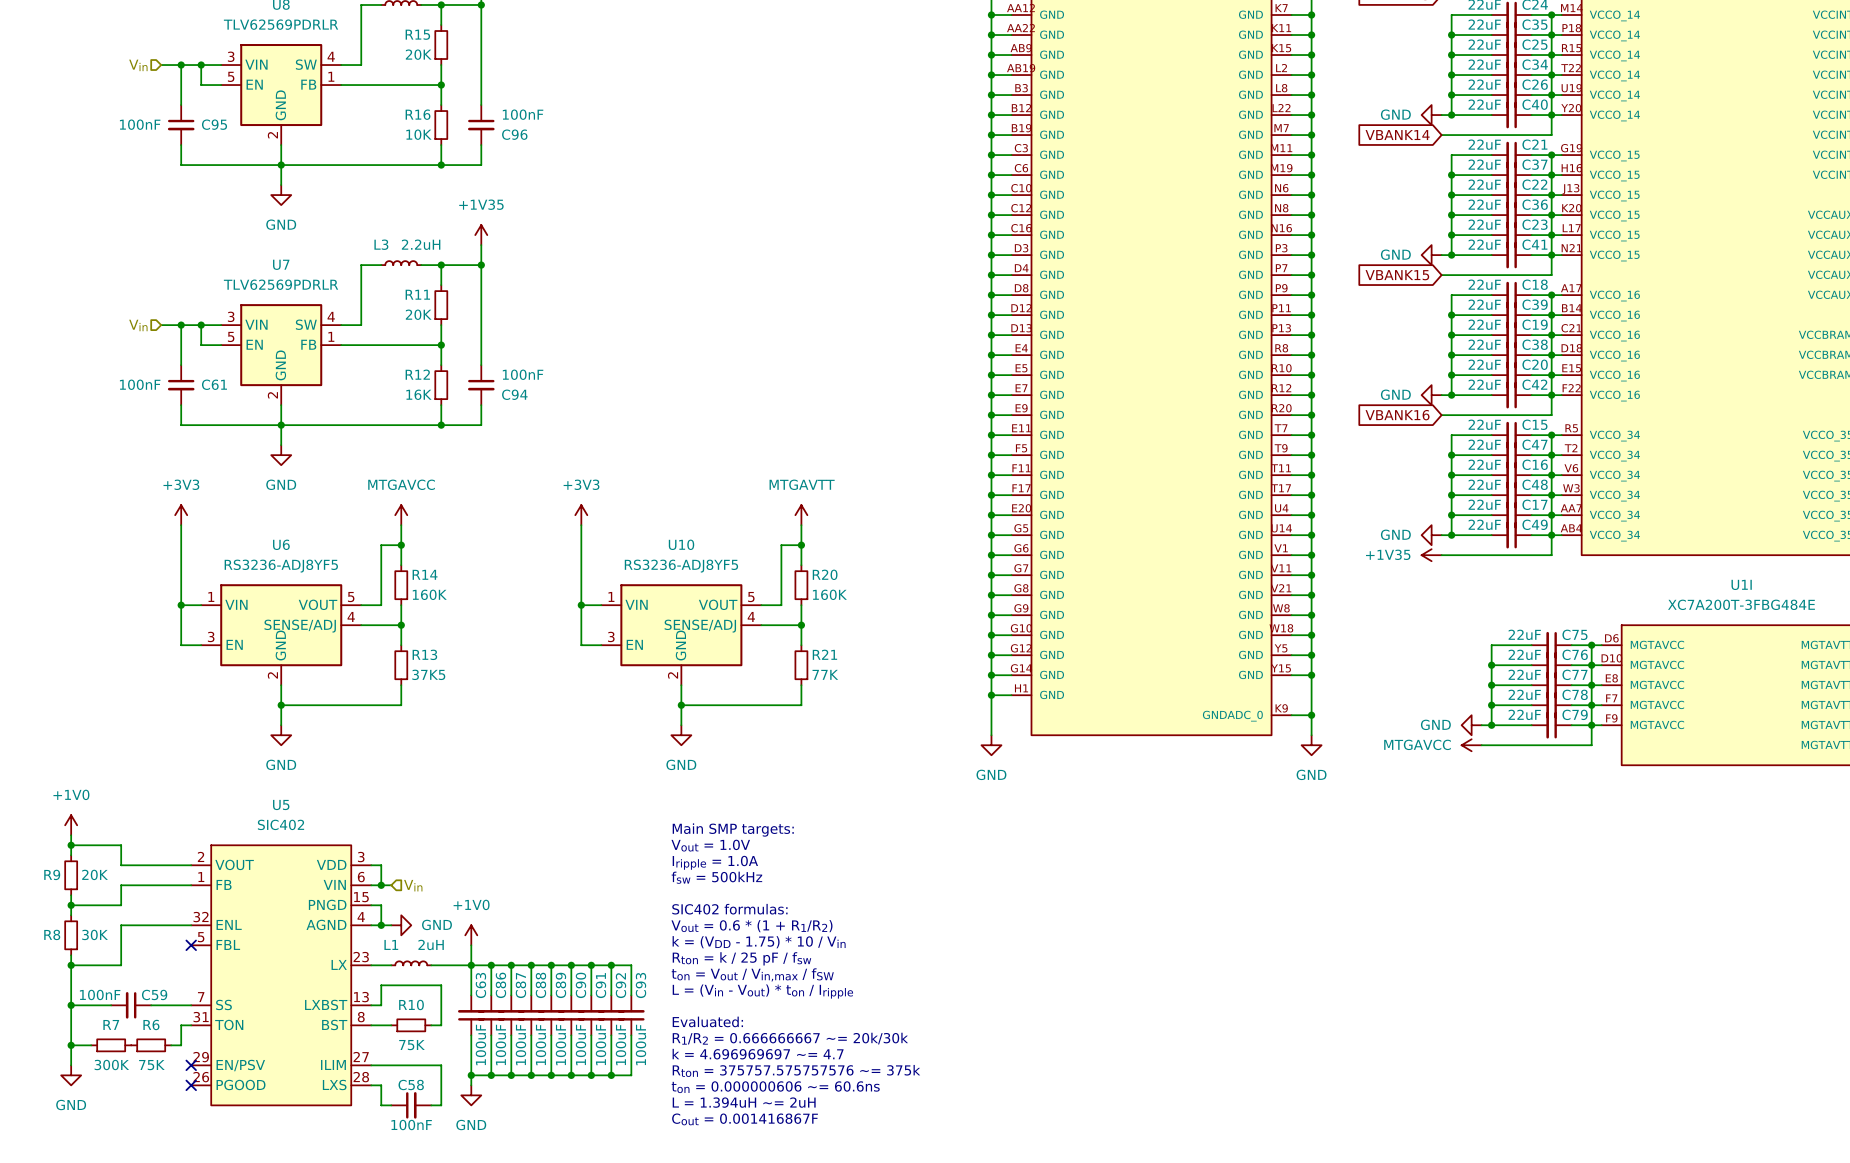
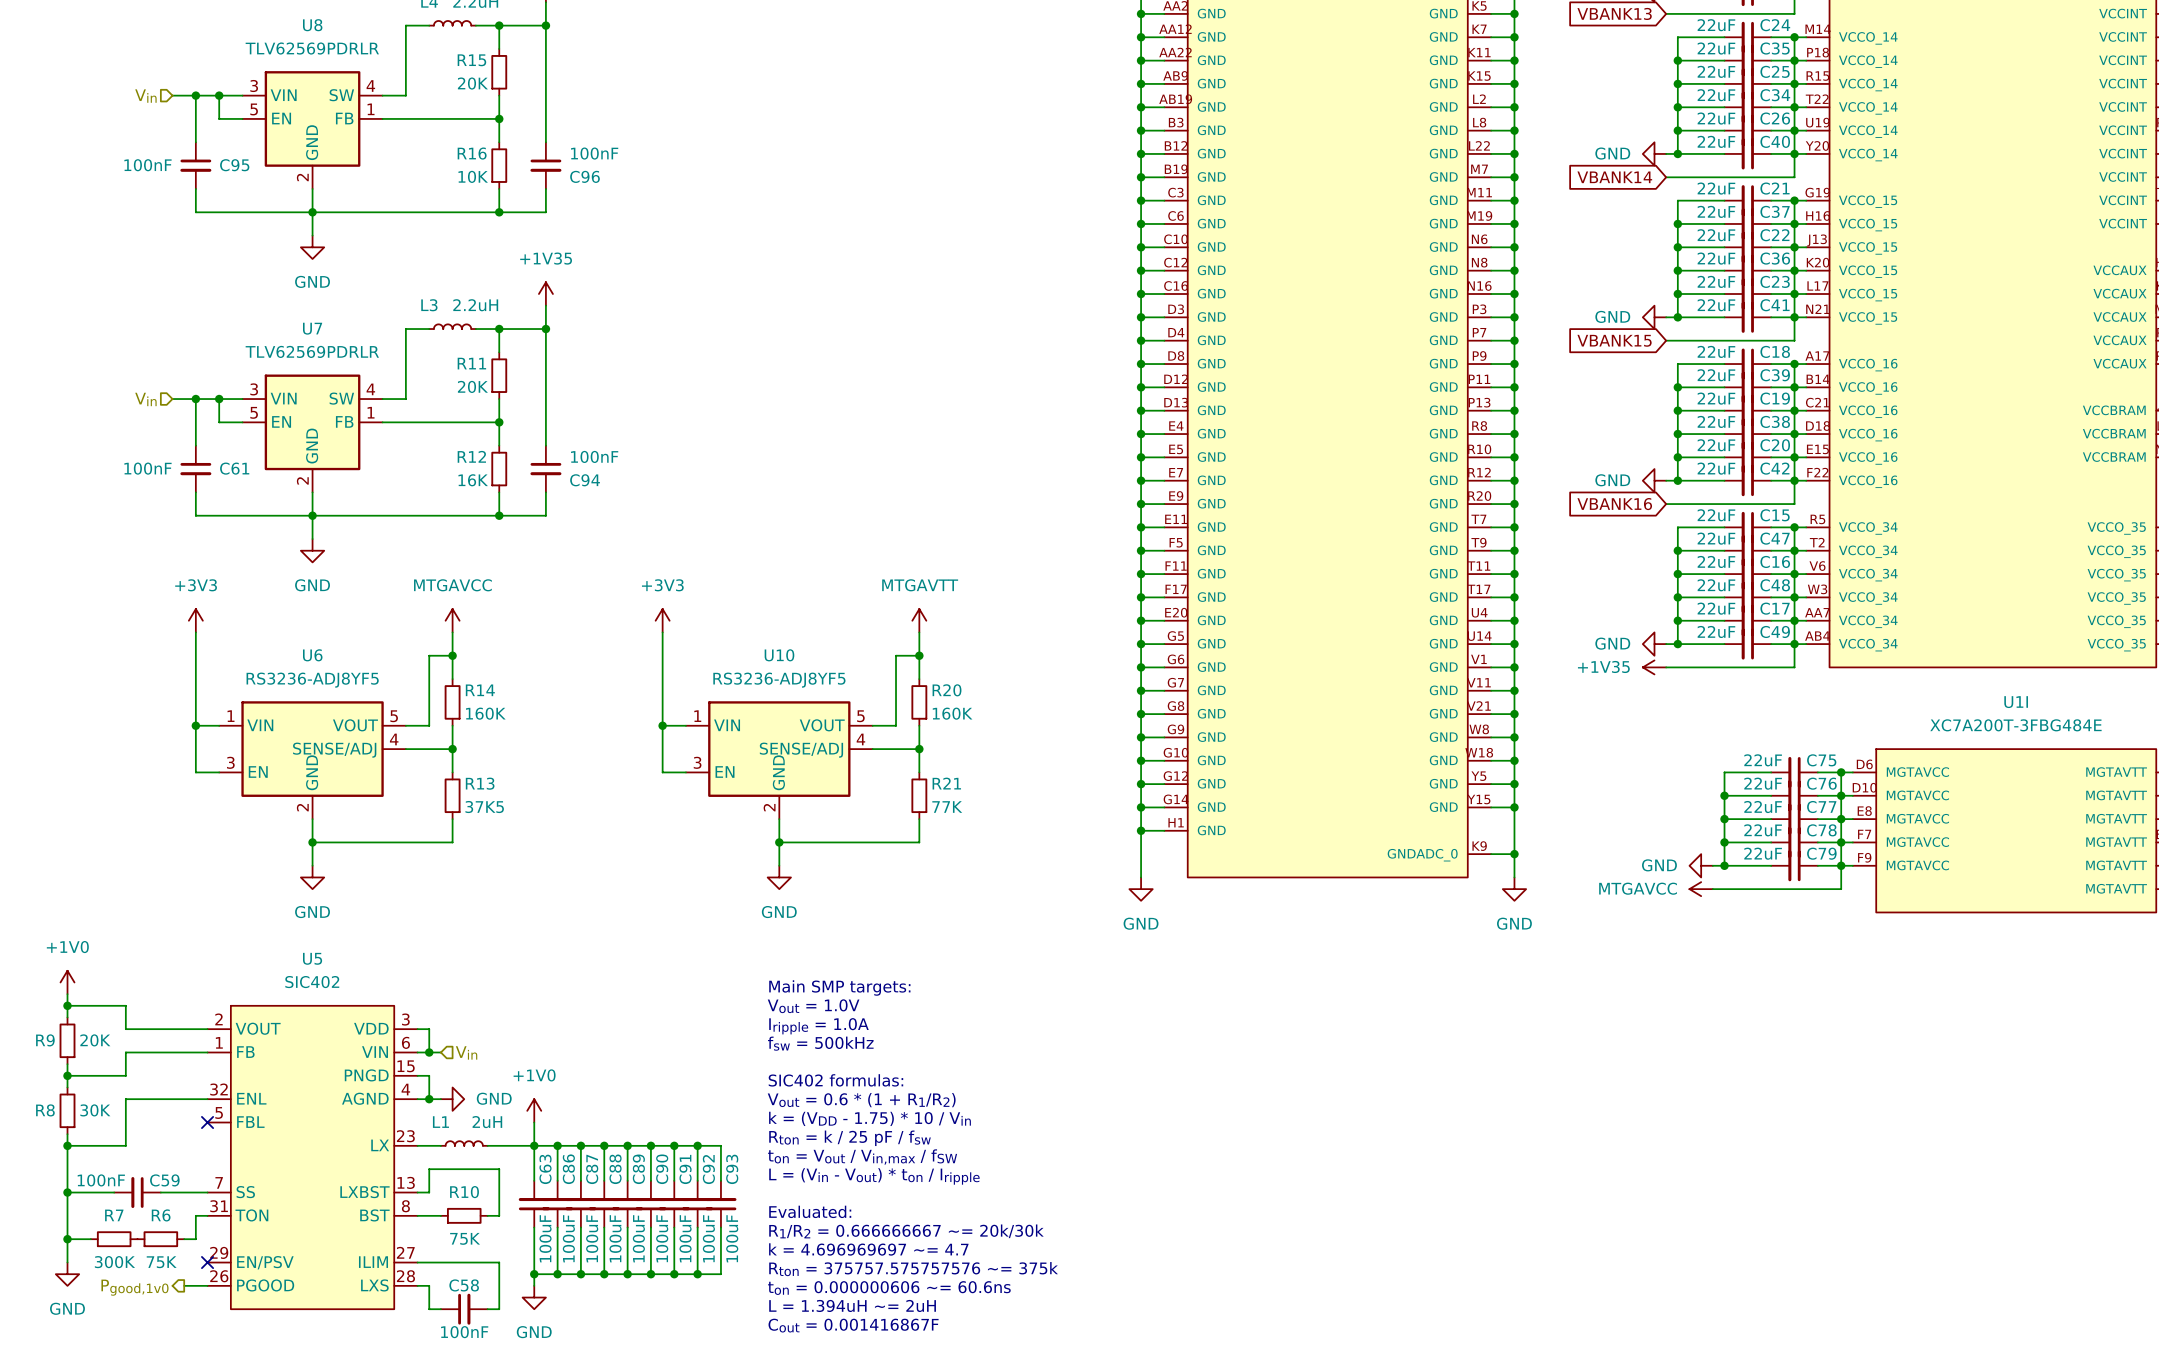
wire: none -> (184, 1285) (207, 1285)
no-connect mark: (191, 1085) -> none
hierarchical label: none -> Pgood,1v0 (134, 1287)

